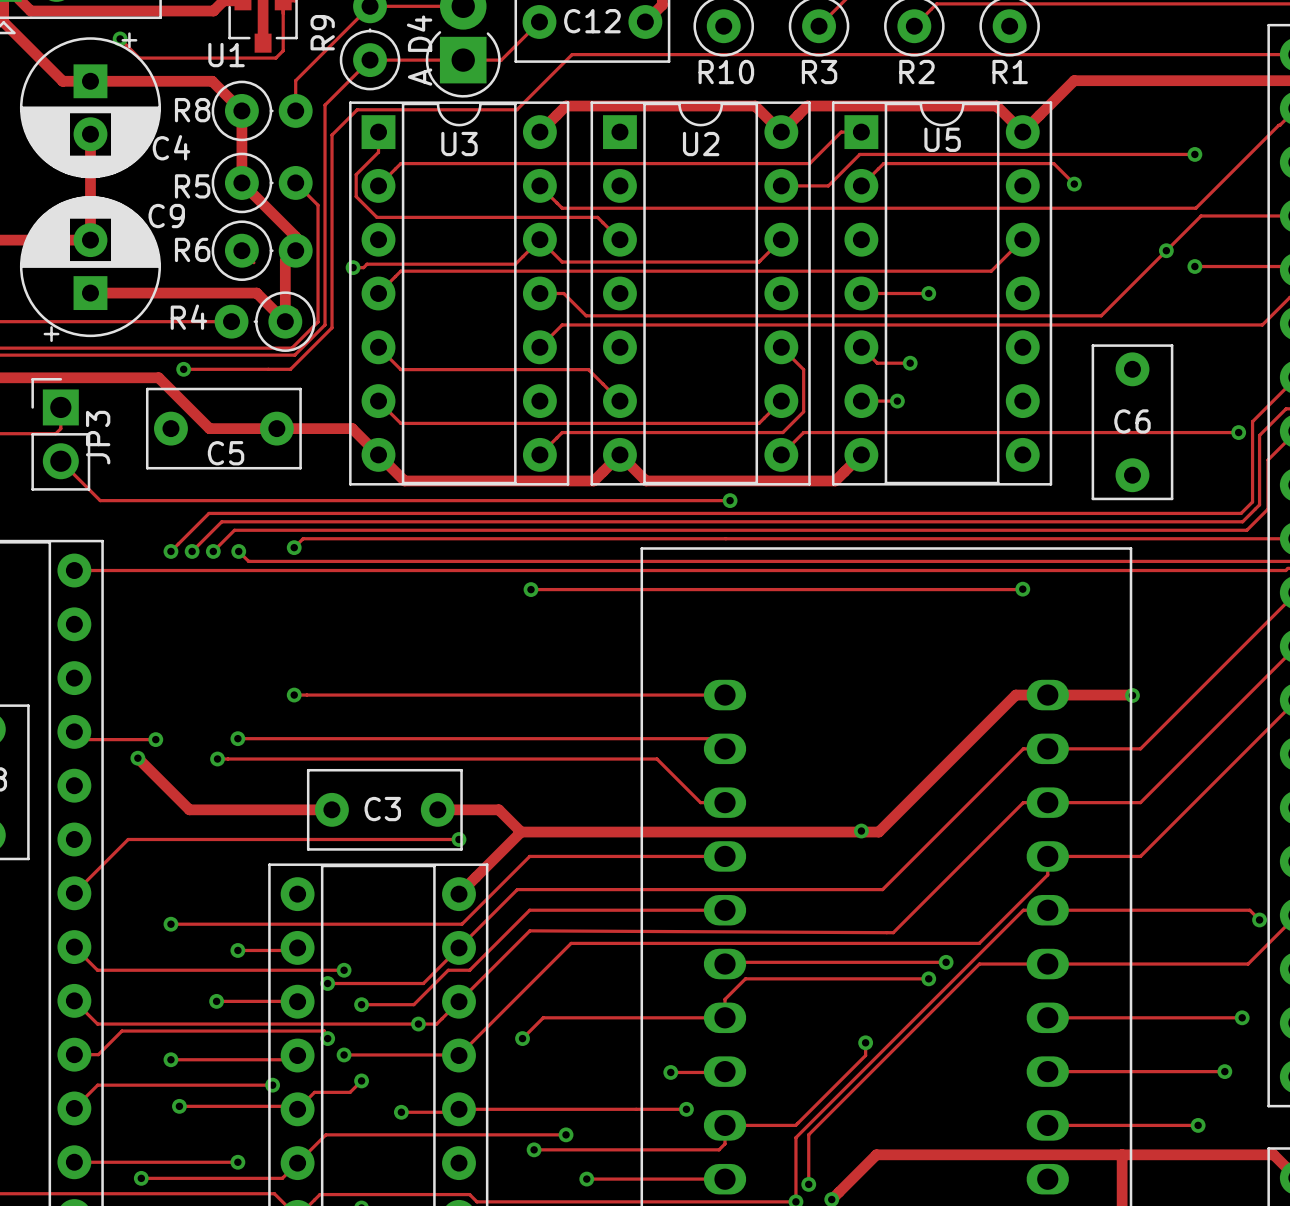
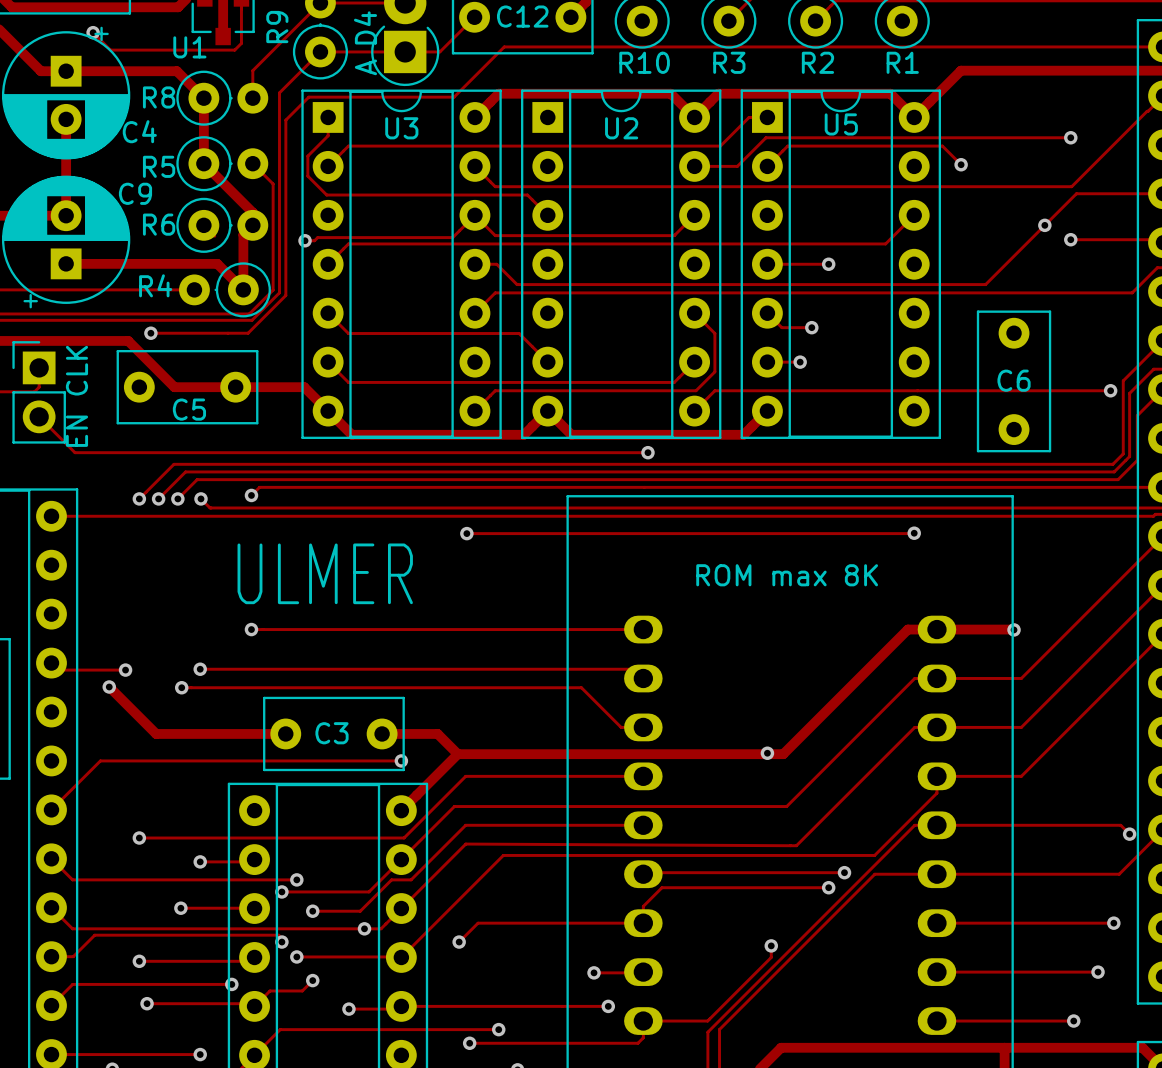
JP3 name: JP3 (98, 437) -> none
text: none -> EN CLK (76, 396)
text: none -> ULMER (325, 573)
text: none -> ROM max 8K (787, 575)

